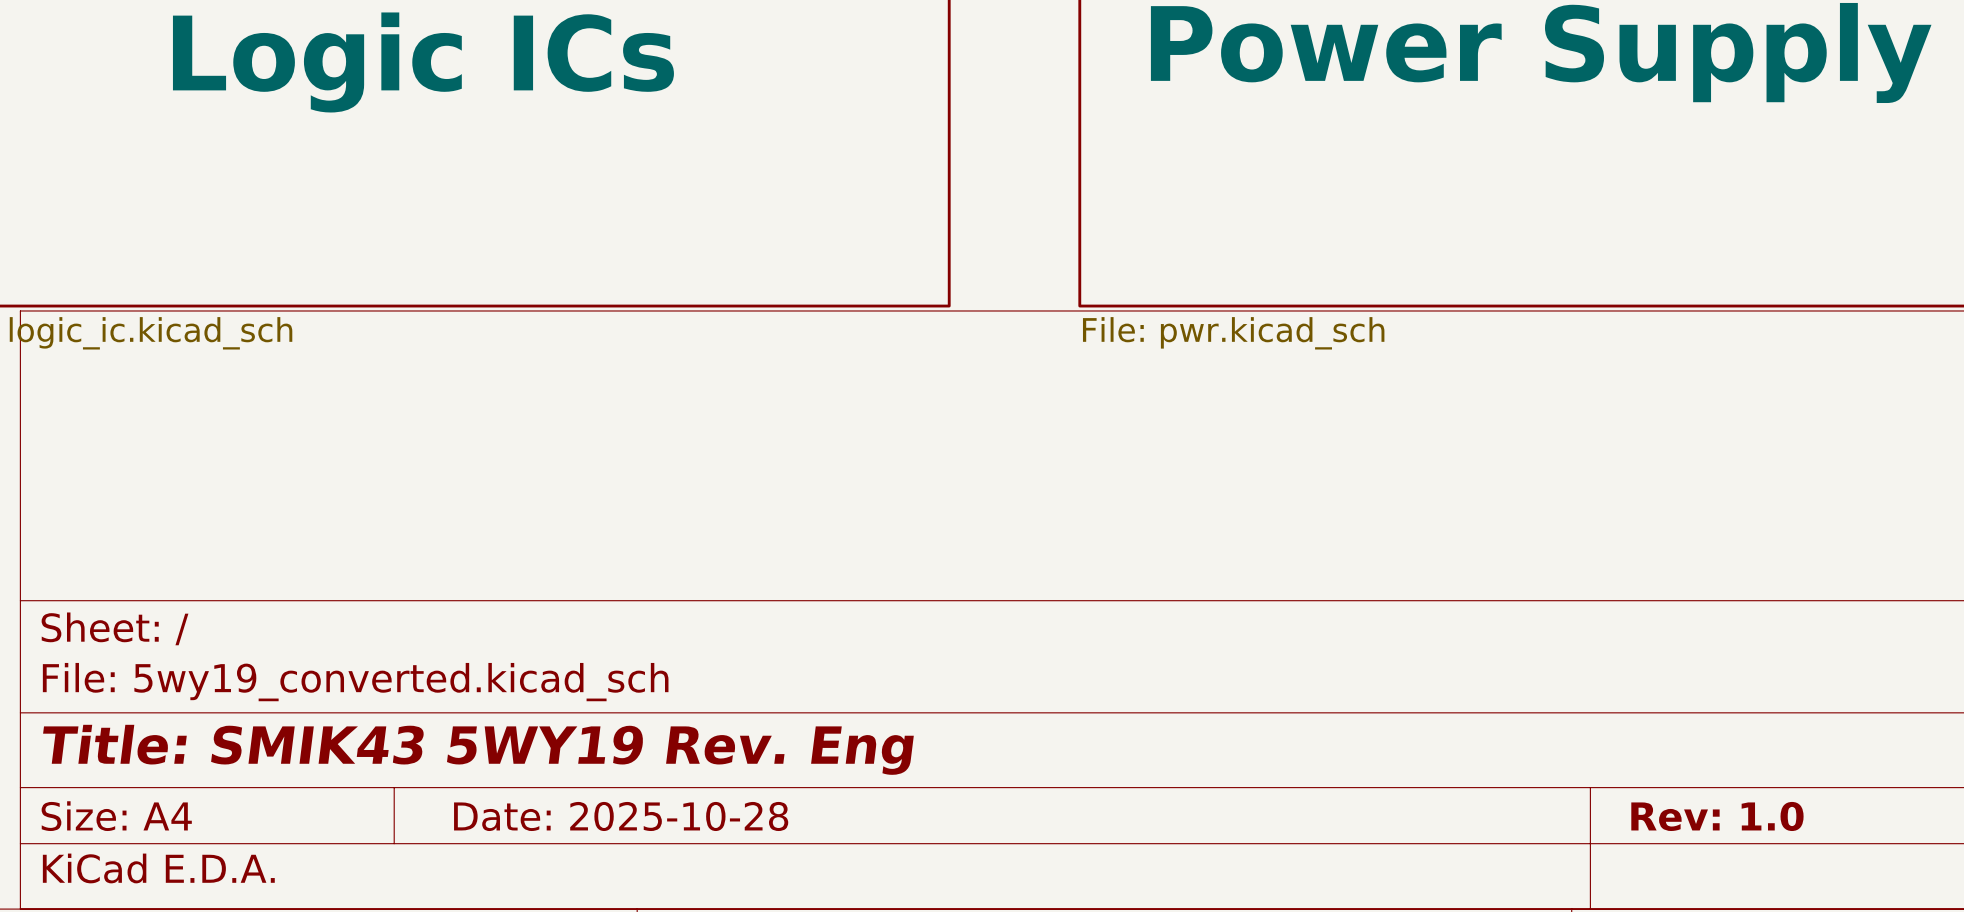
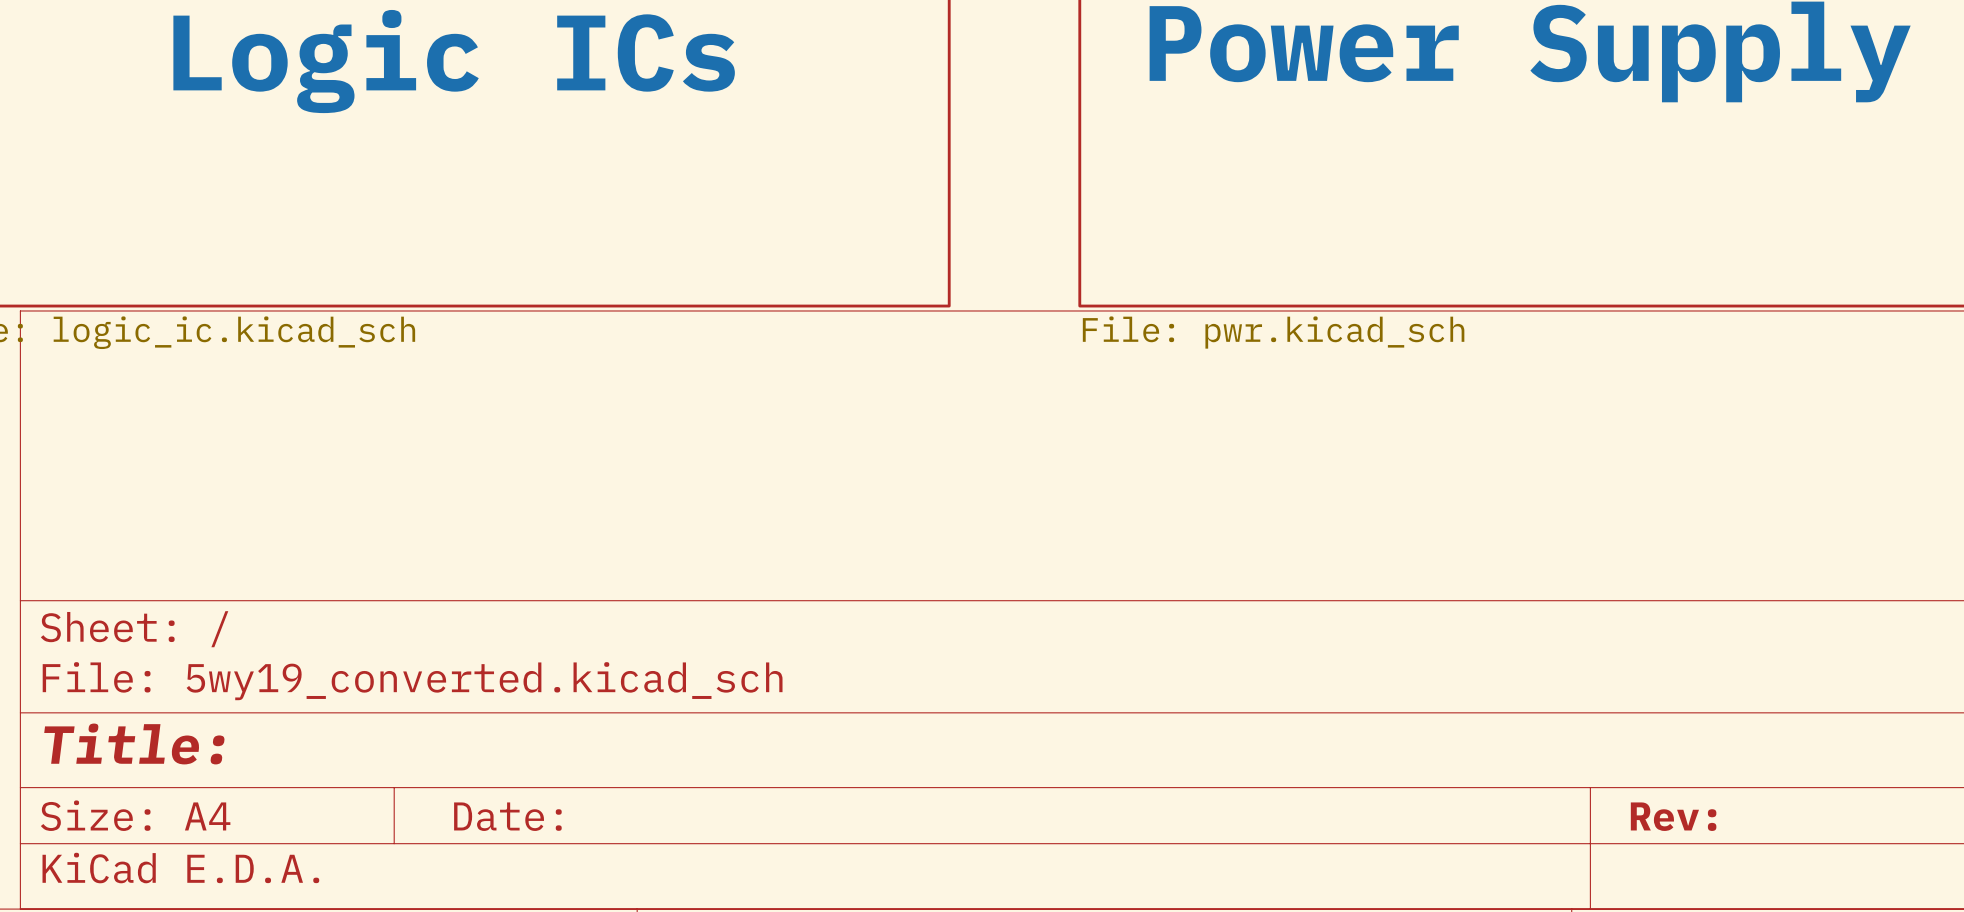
title block: Title: SMIK43 5WY19 Rev. Eng (478, 749) -> Title: (134, 743)
title block: Date: 2025-10-28 (621, 816) -> Date: (507, 816)
title block: Rev: 1.0 (1717, 816) -> Rev: (1673, 816)

